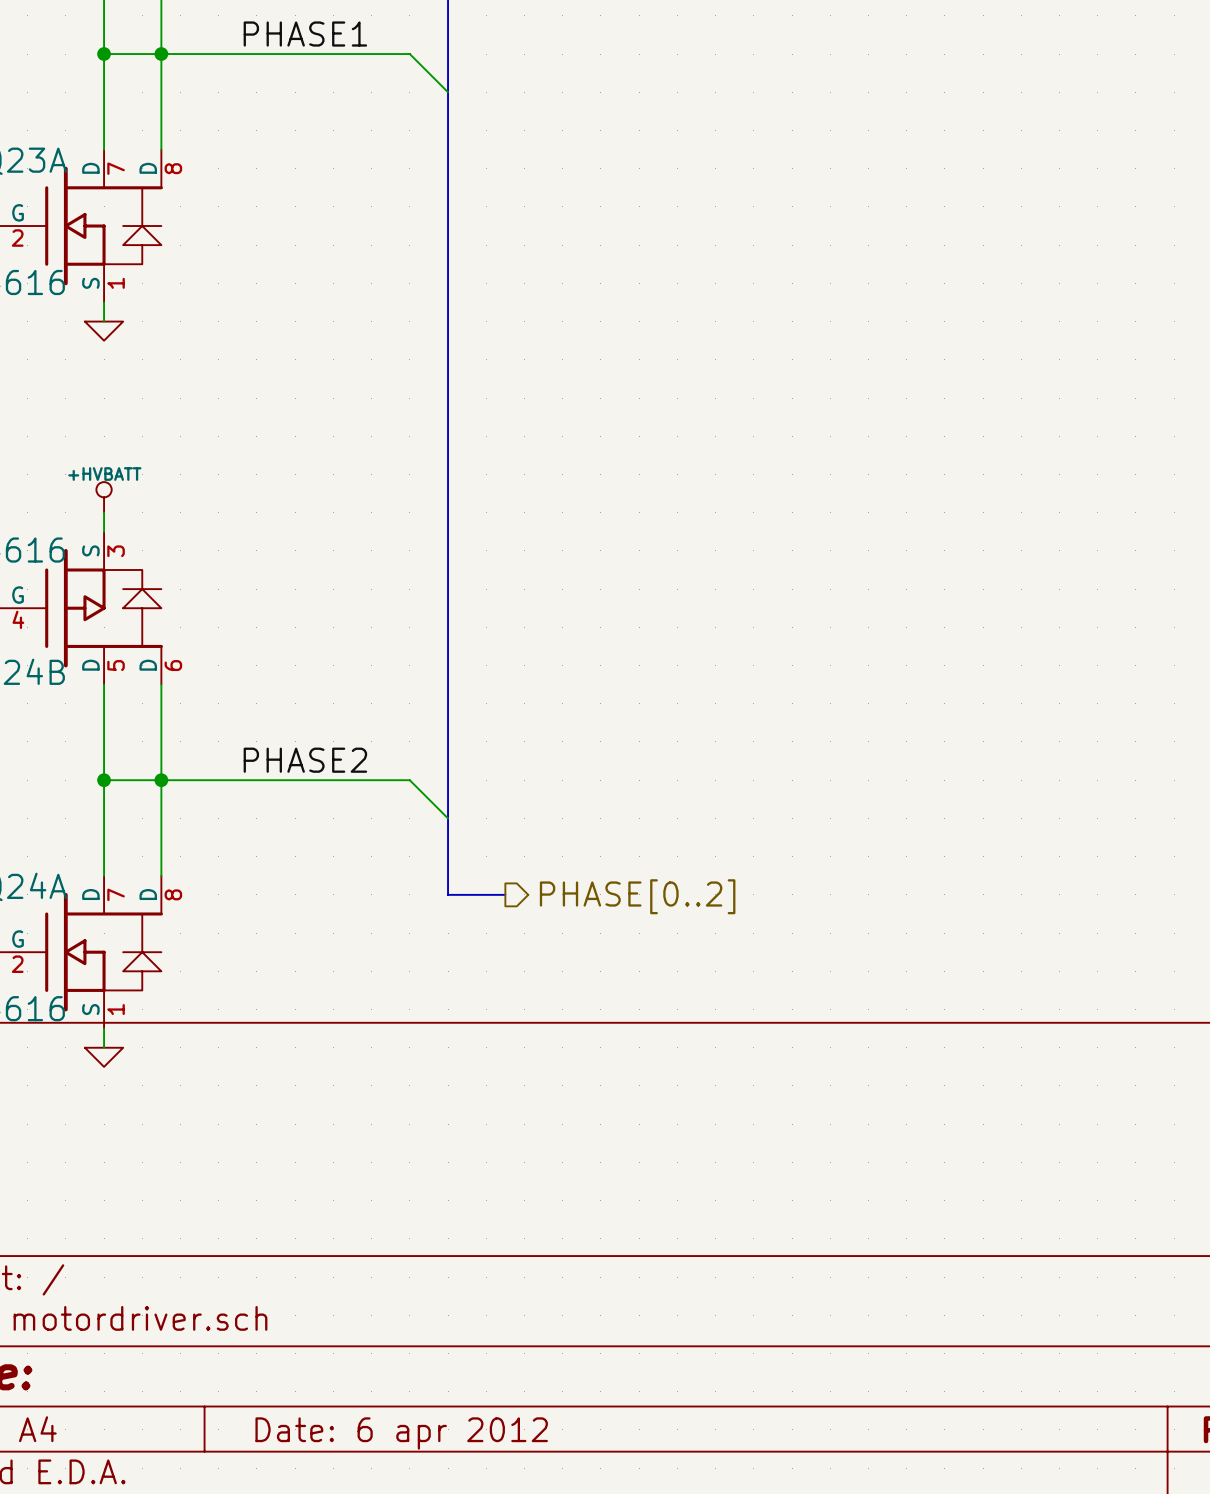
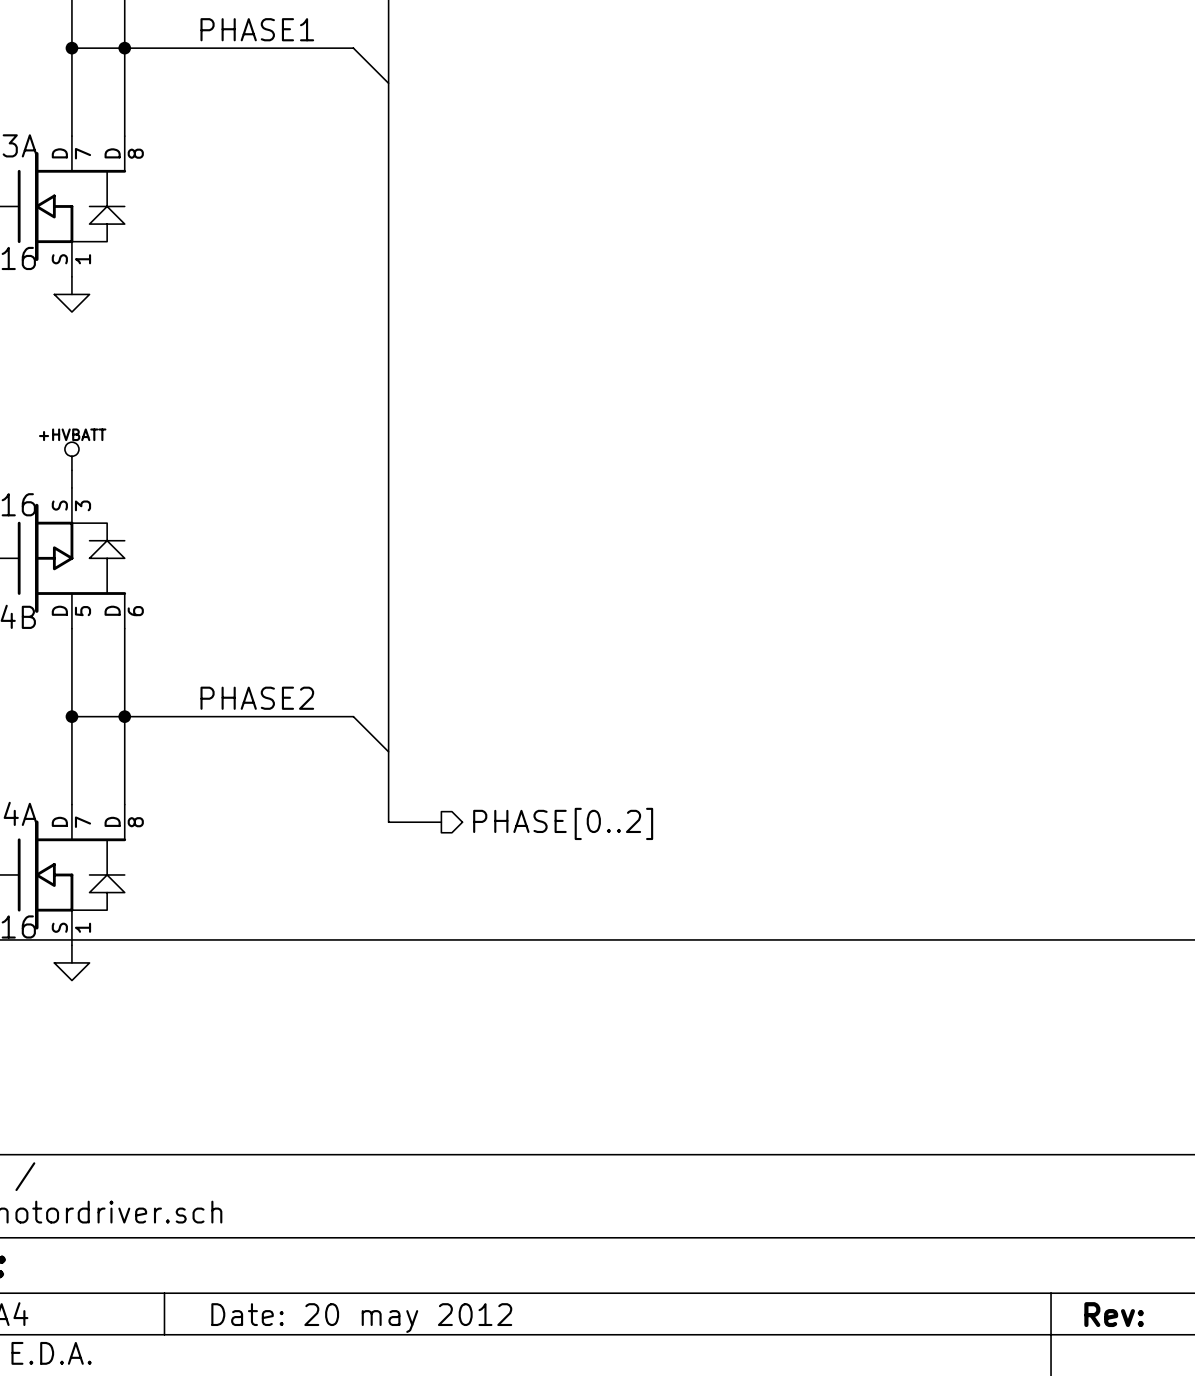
title block: Date: 6 apr 2012 (401, 1433) -> Date: 20 may 2012 (361, 1318)

